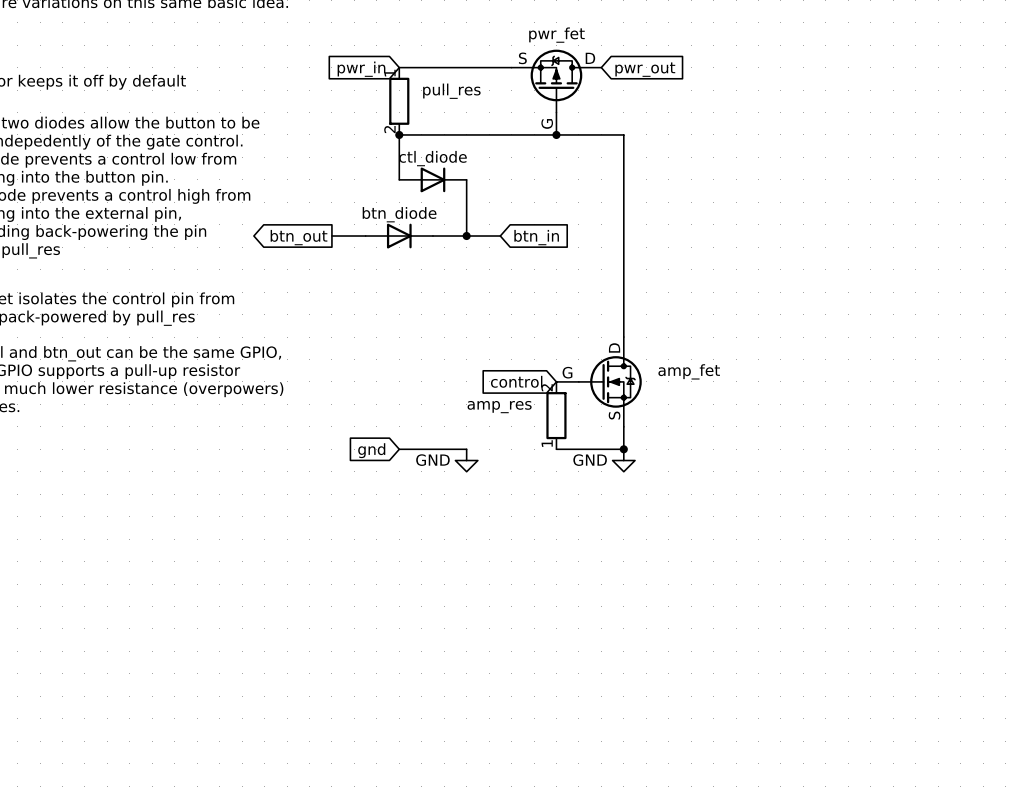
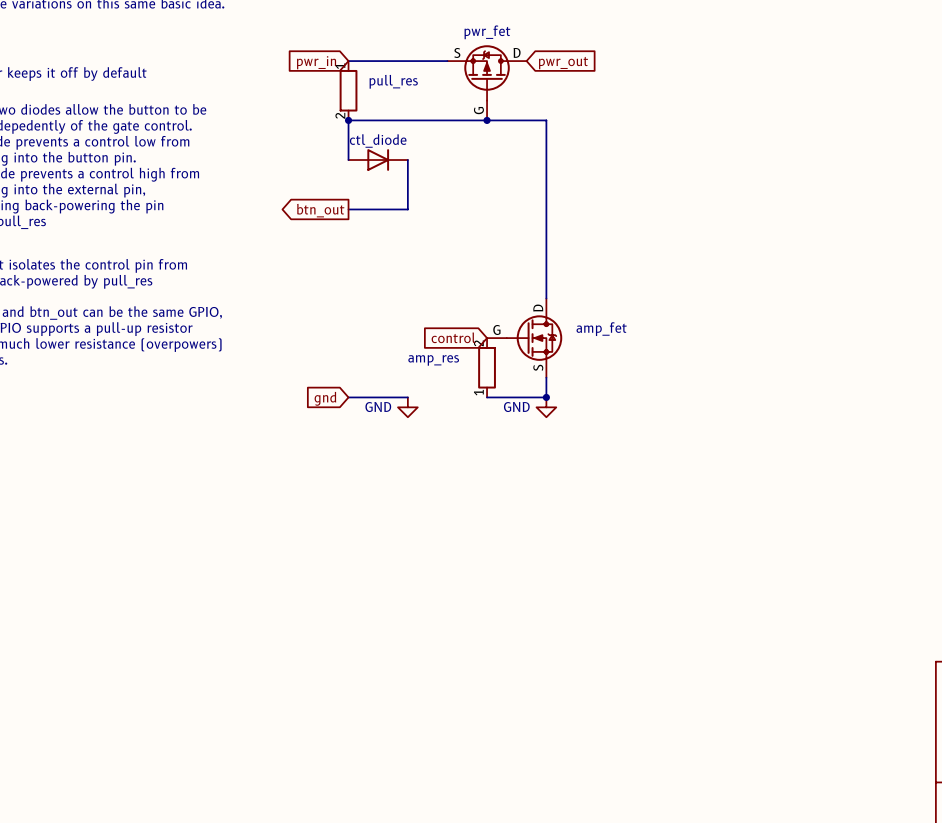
btn_diode: (399, 236) -> none
wire: (466, 236) (500, 236) -> none
junction: (466, 236) -> none
global label position: btn_out (299, 237) -> btn_out (320, 210)
global label: btn_in (536, 237) -> none

